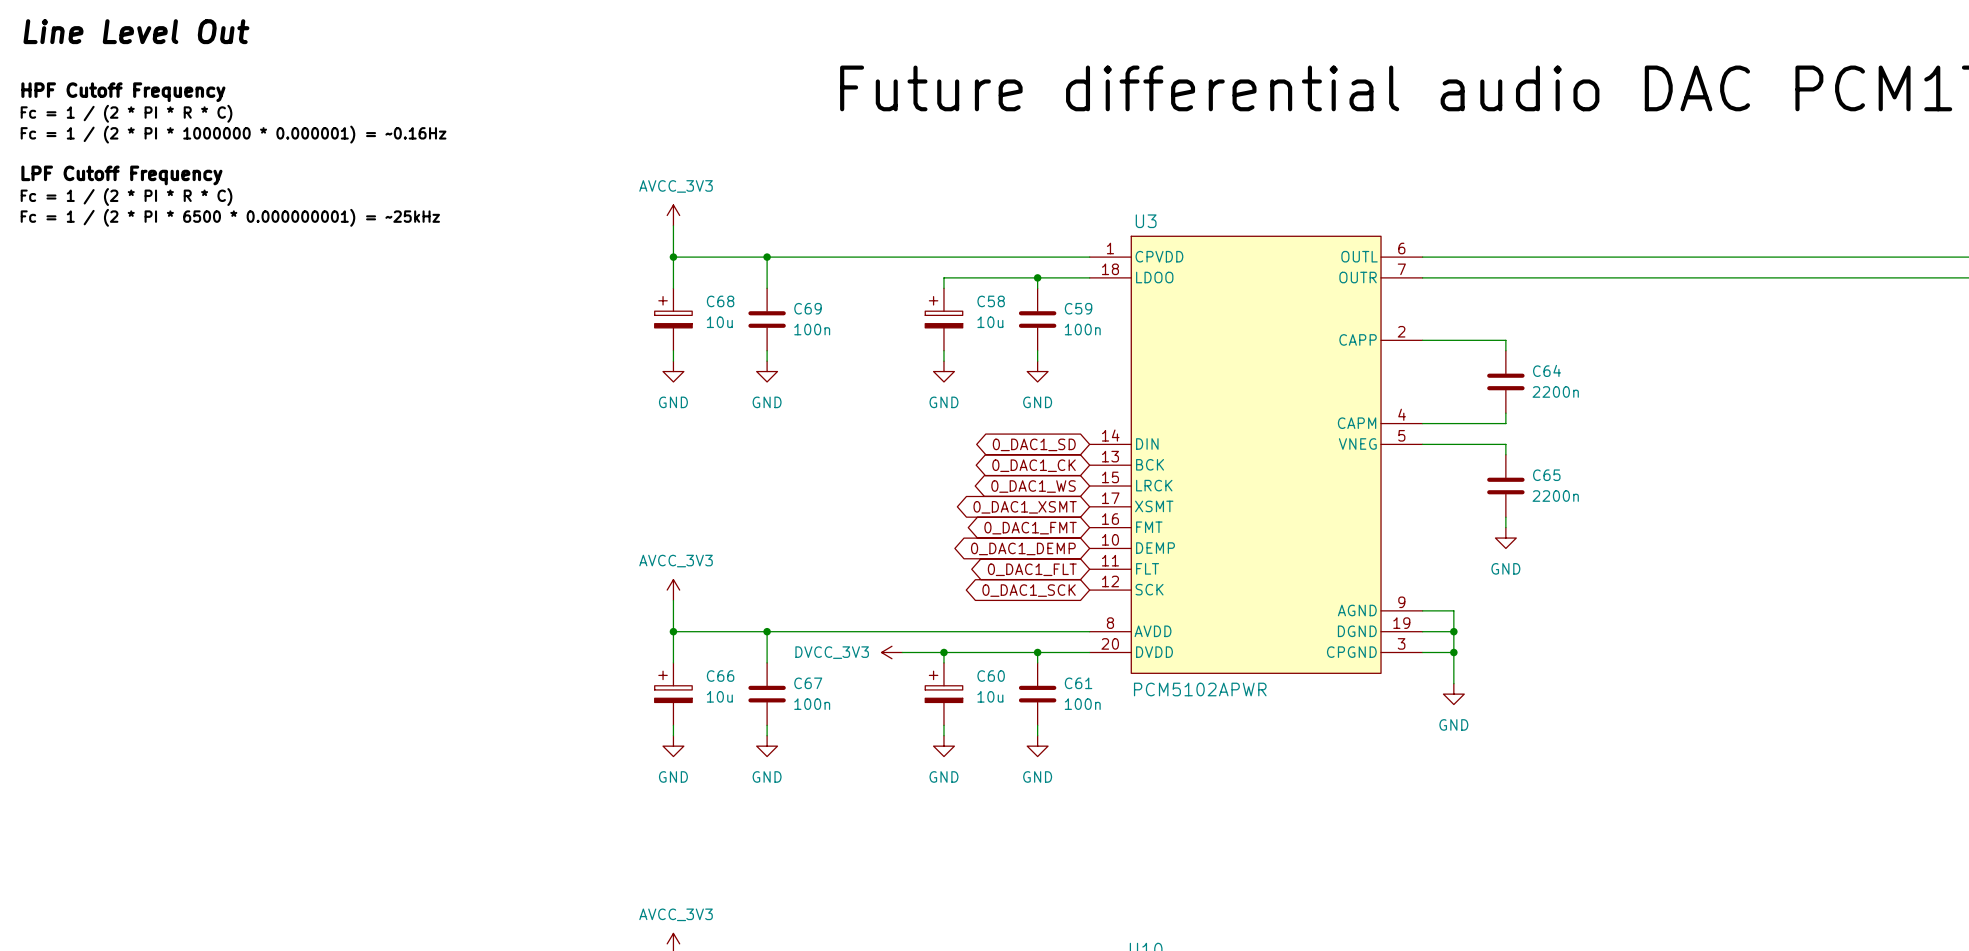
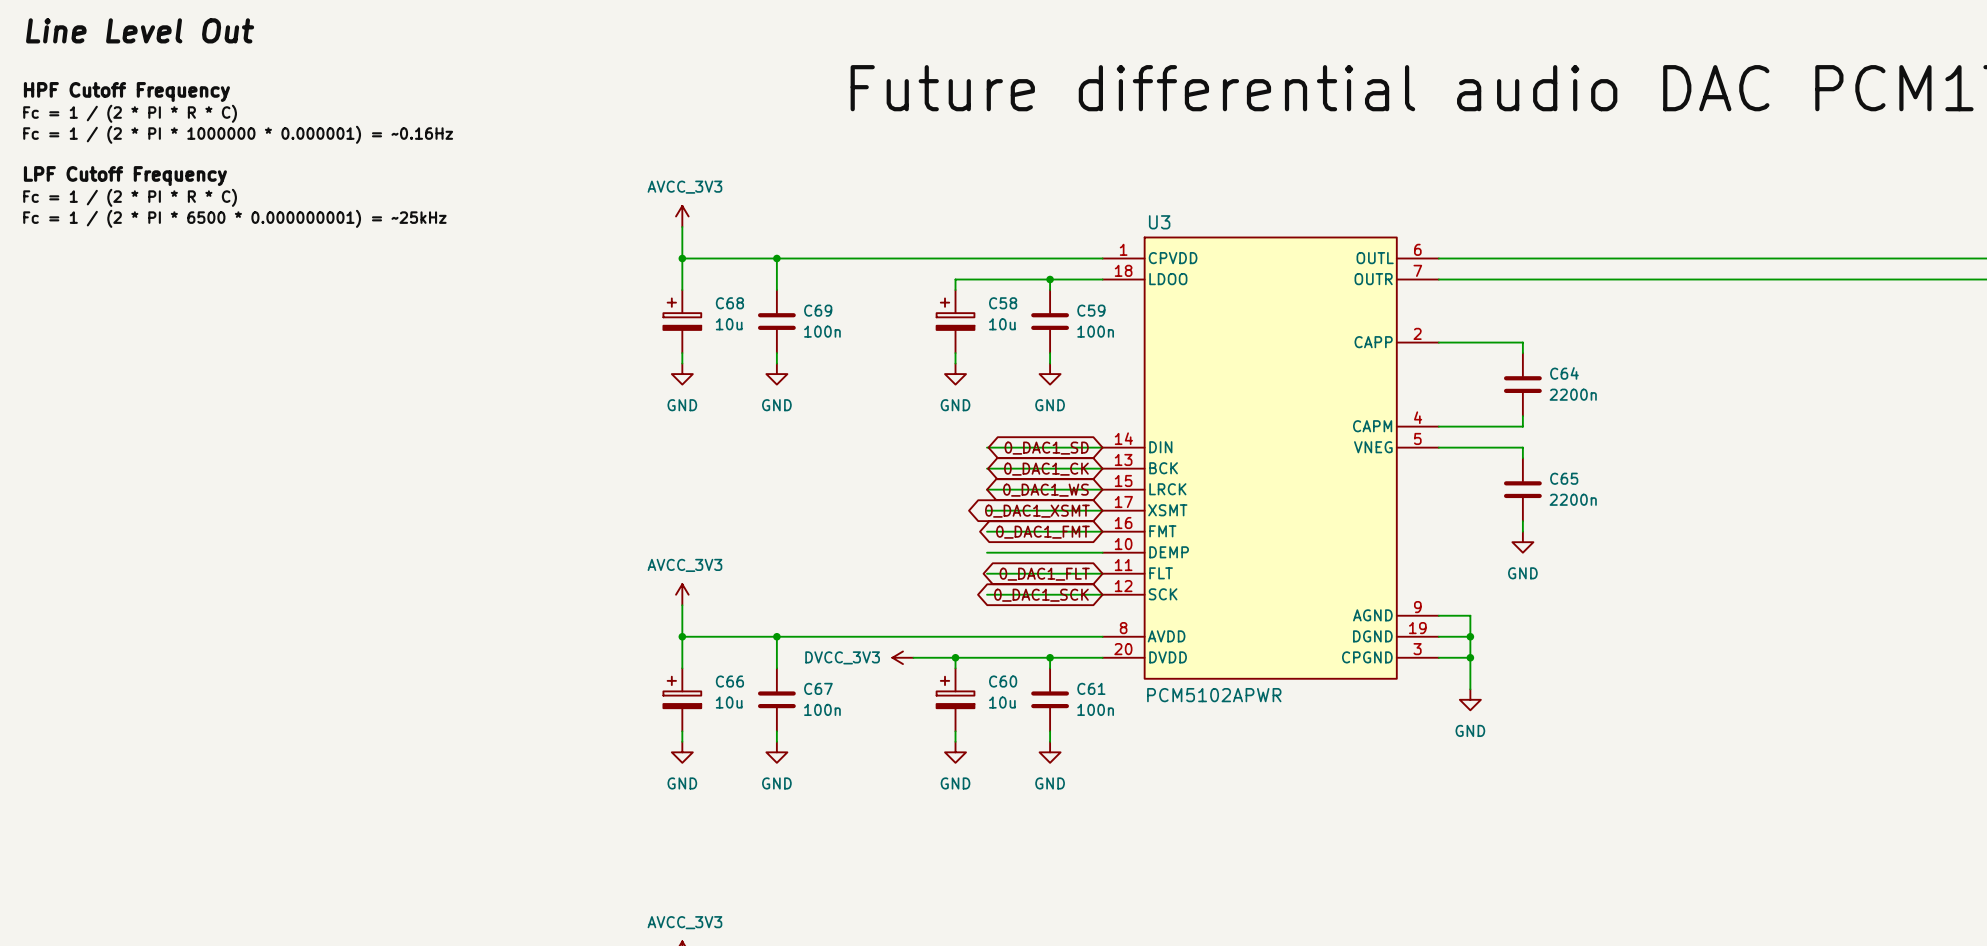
wire: none -> (987, 447) (1102, 447)
wire: none -> (987, 468) (1102, 468)
wire: none -> (987, 489) (1102, 489)
wire: none -> (987, 510) (1102, 510)
wire: none -> (987, 531) (1102, 531)
wire: none -> (987, 552) (1102, 552)
global label: 0_DAC1_DEMP (1023, 548) -> none
wire: none -> (987, 573) (1102, 573)
wire: none -> (987, 594) (1102, 594)

